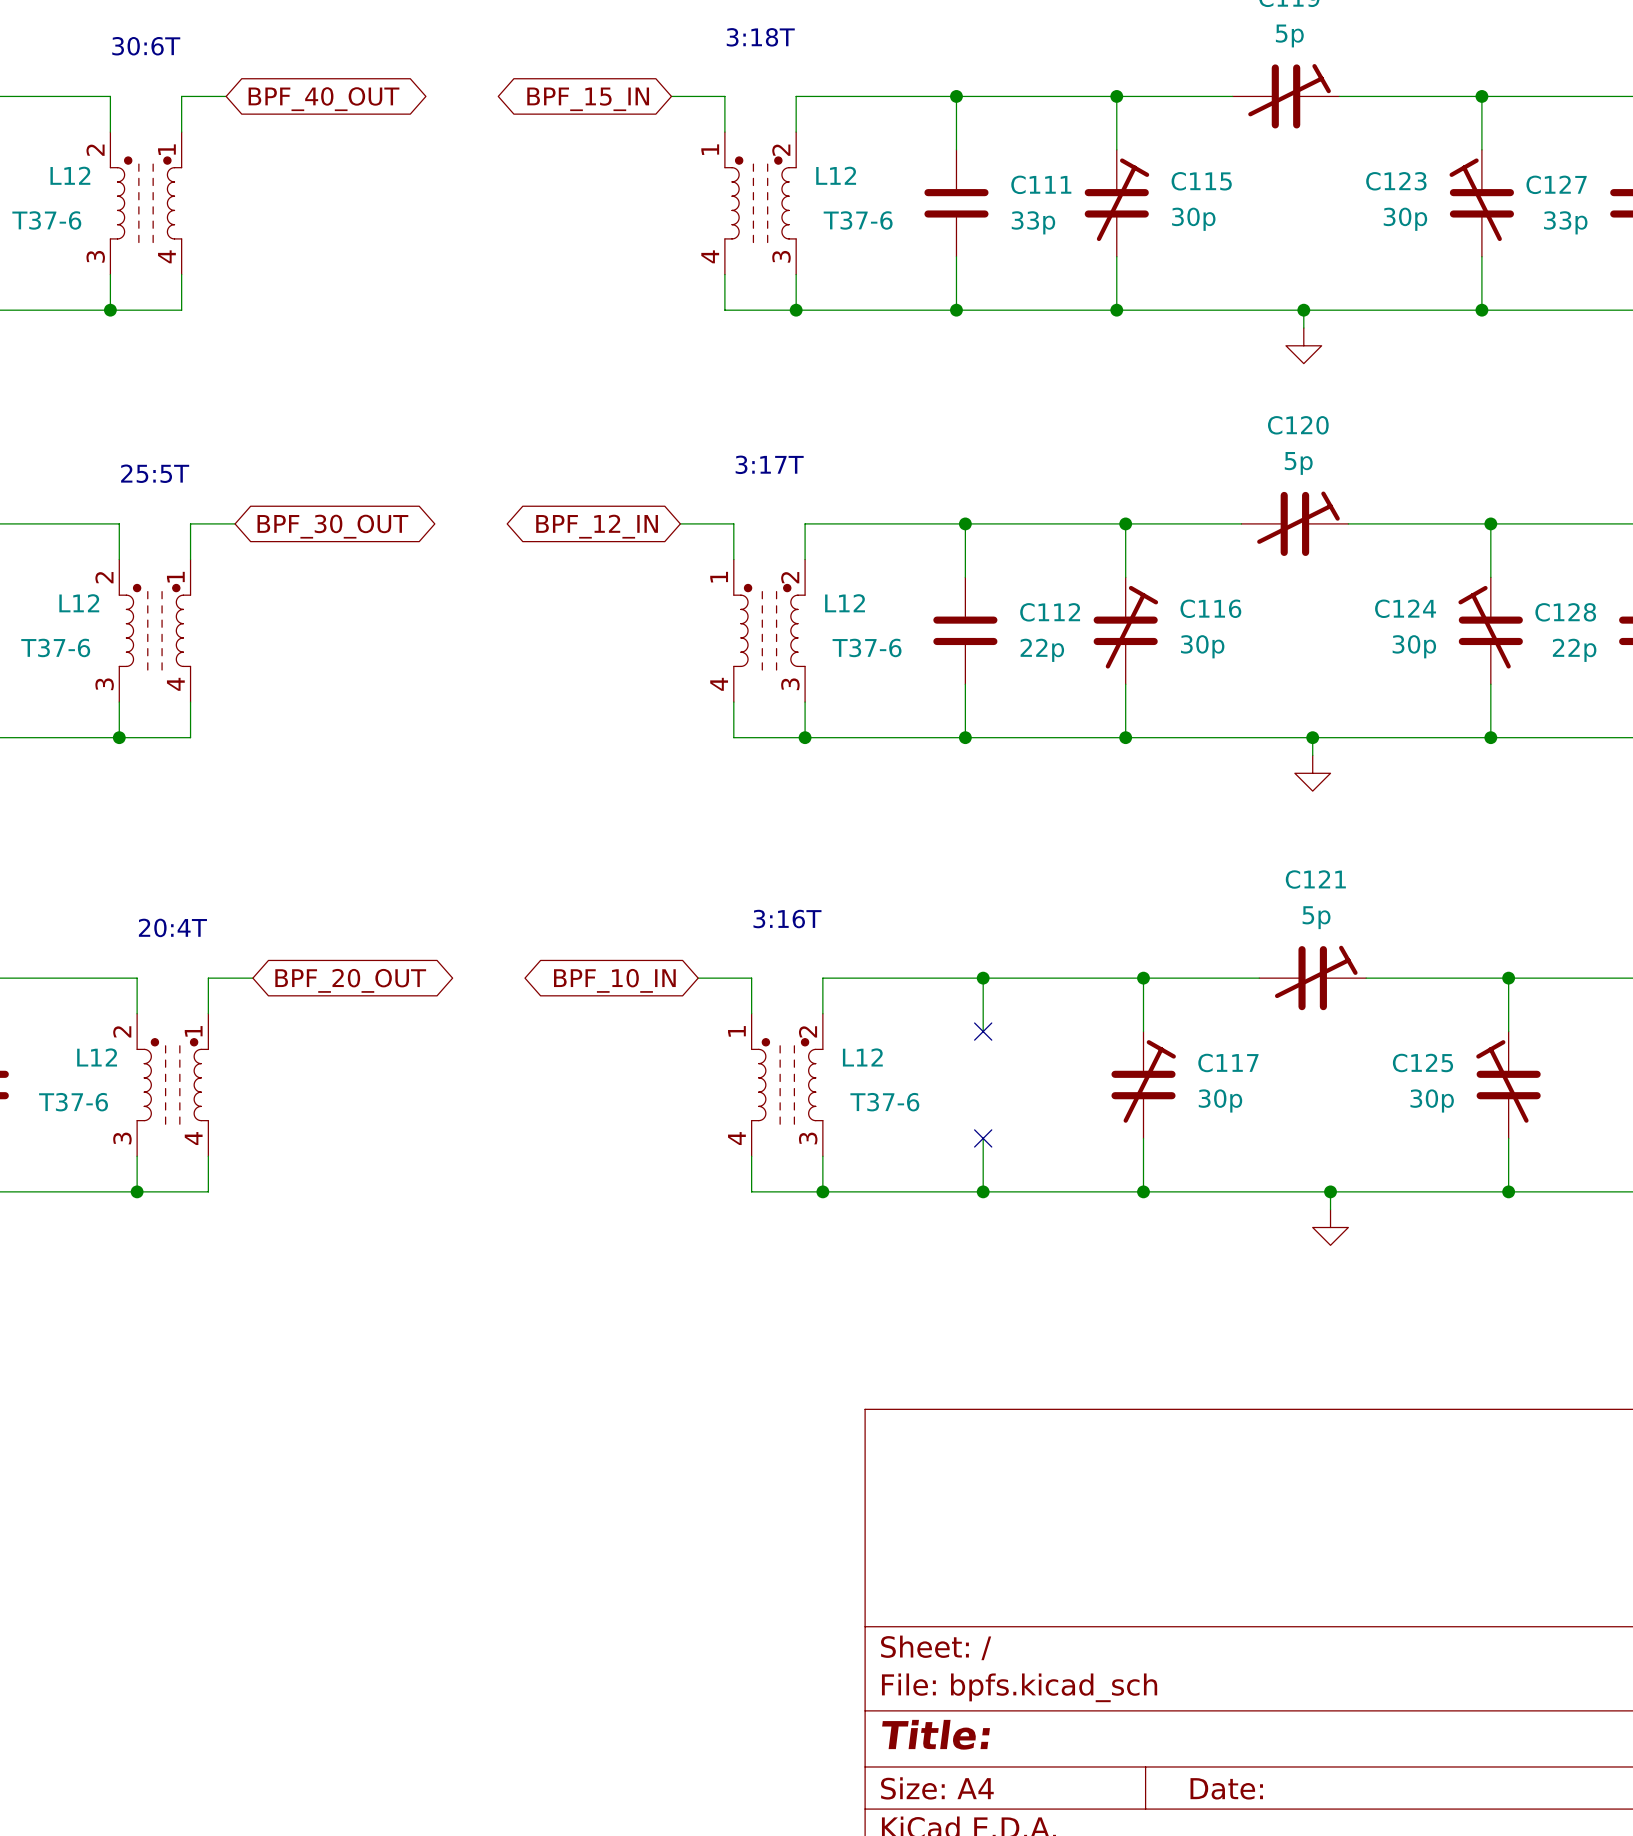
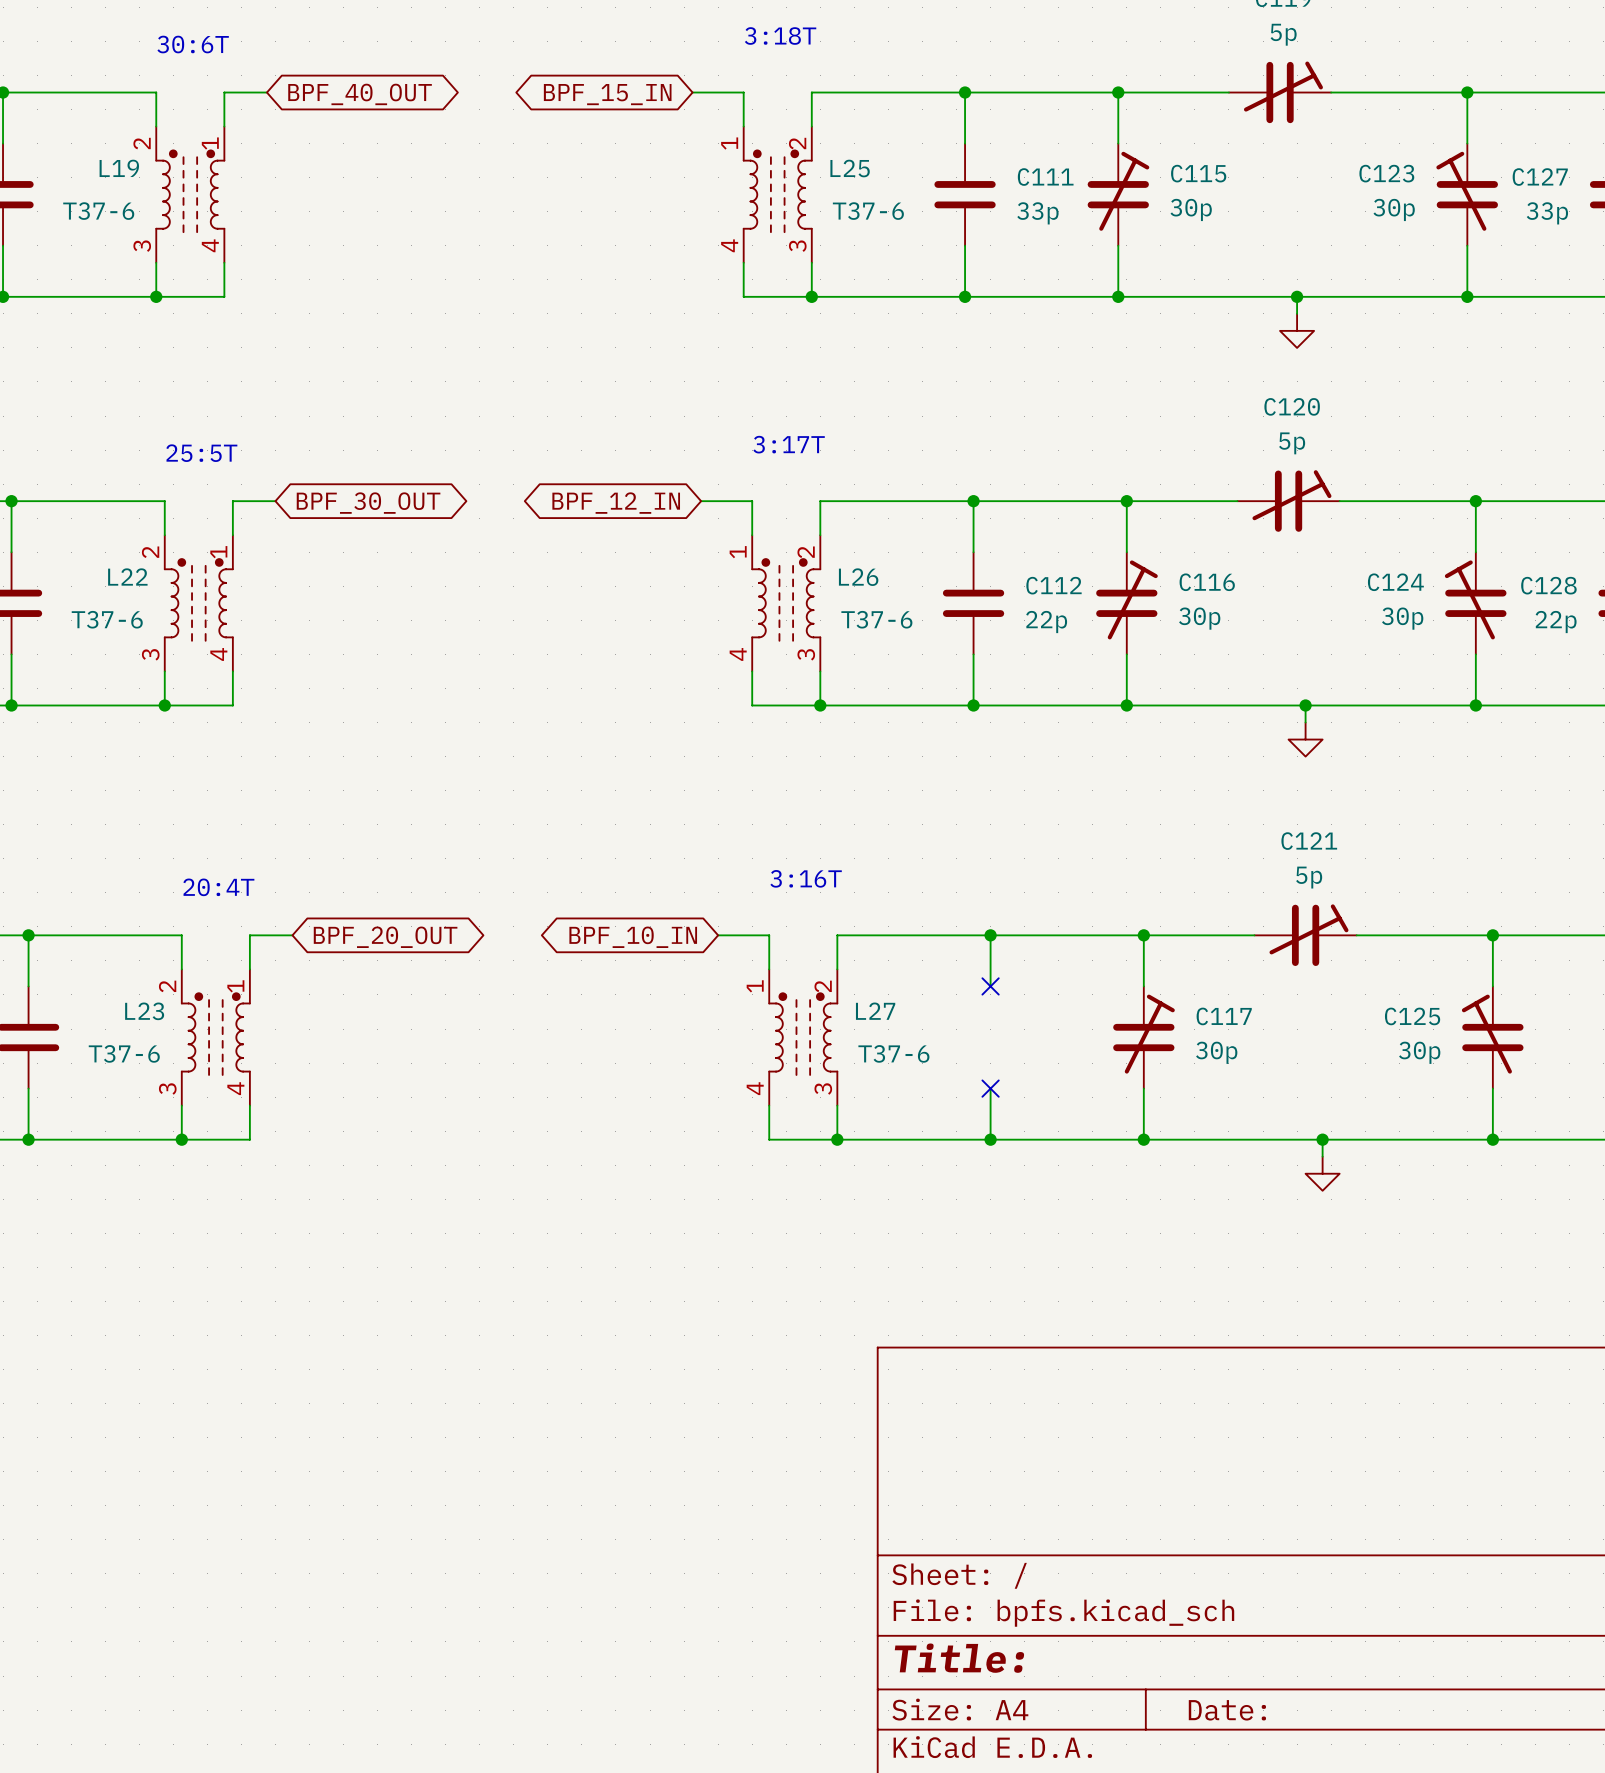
L12 name: L12 (70, 175) -> L19 (119, 168)
L12 name: L12 (836, 175) -> L25 (850, 168)
L12 name: L12 (79, 603) -> L22 (127, 577)
L12 name: L12 (845, 603) -> L26 (858, 577)
L12 name: L12 (97, 1057) -> L23 (144, 1011)
L12 name: L12 (862, 1057) -> L27 (875, 1011)

